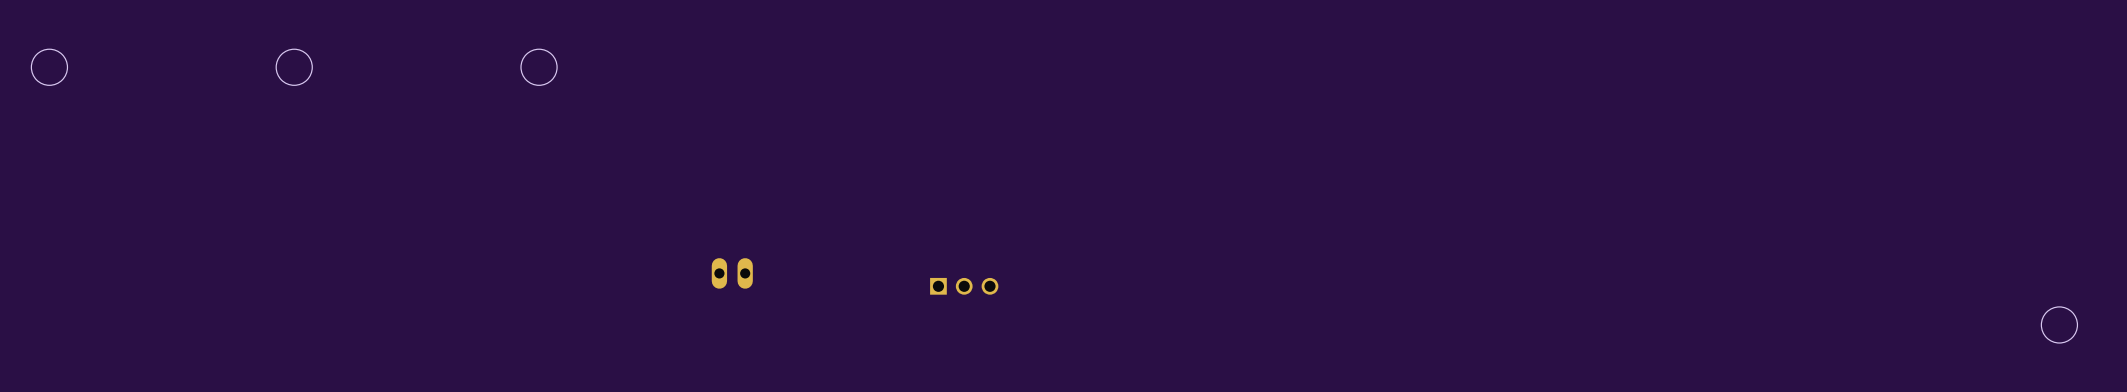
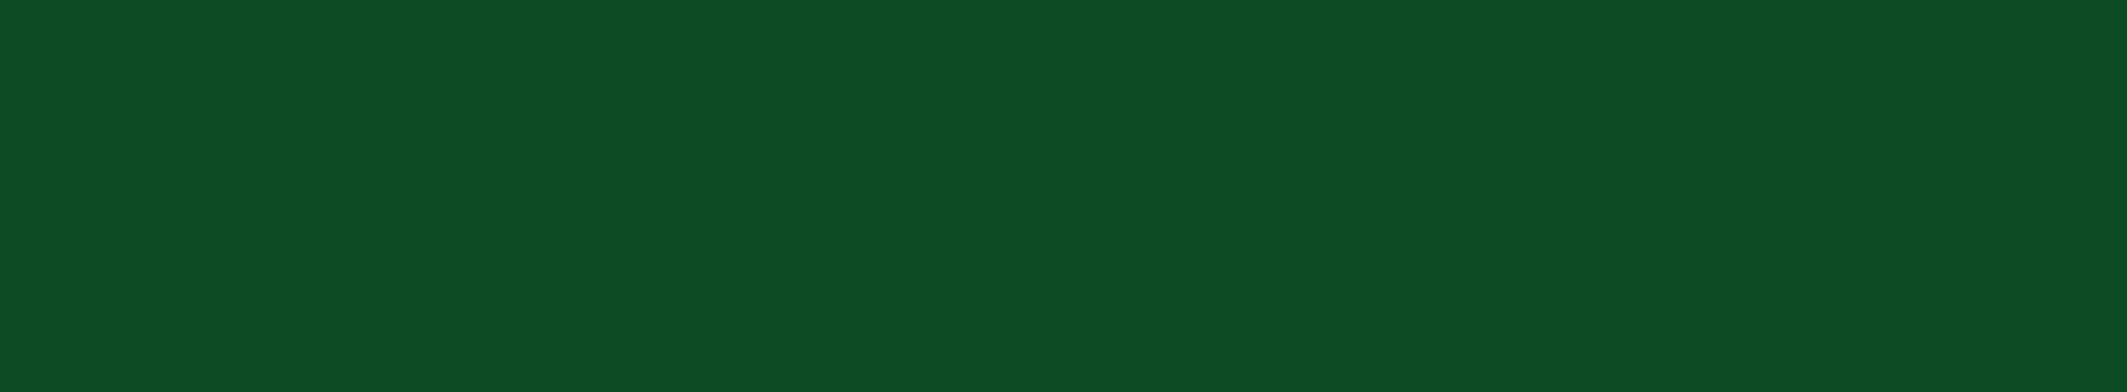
drawing: [31, 49, 68, 86] -> none
drawing: [276, 49, 313, 86] -> none
drawing: [520, 49, 558, 86] -> none
part: (732, 273) -> none
part: (964, 286) -> none
drawing: [2041, 306, 2078, 344] -> none

